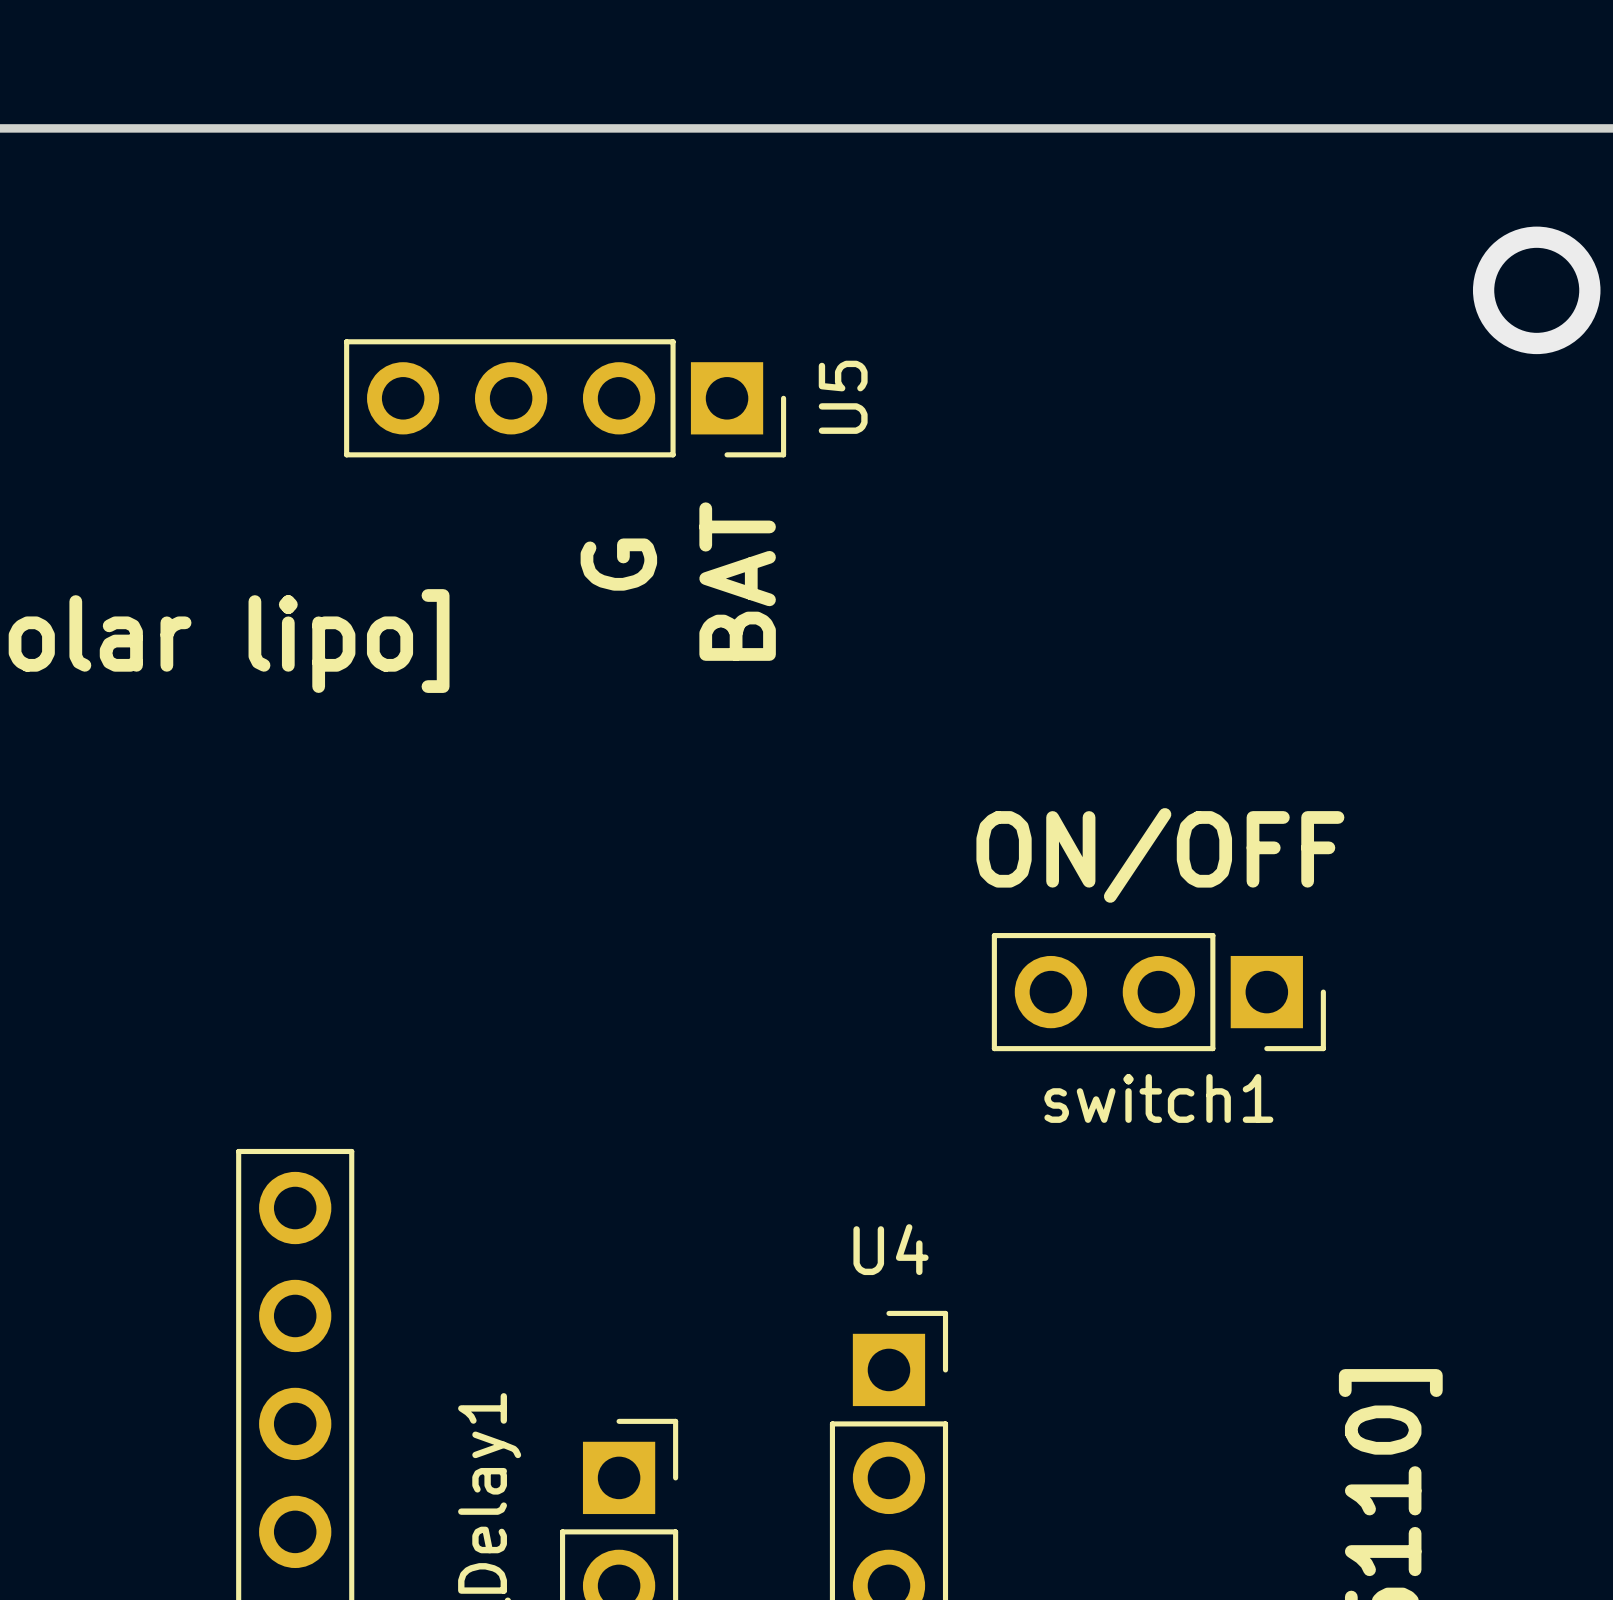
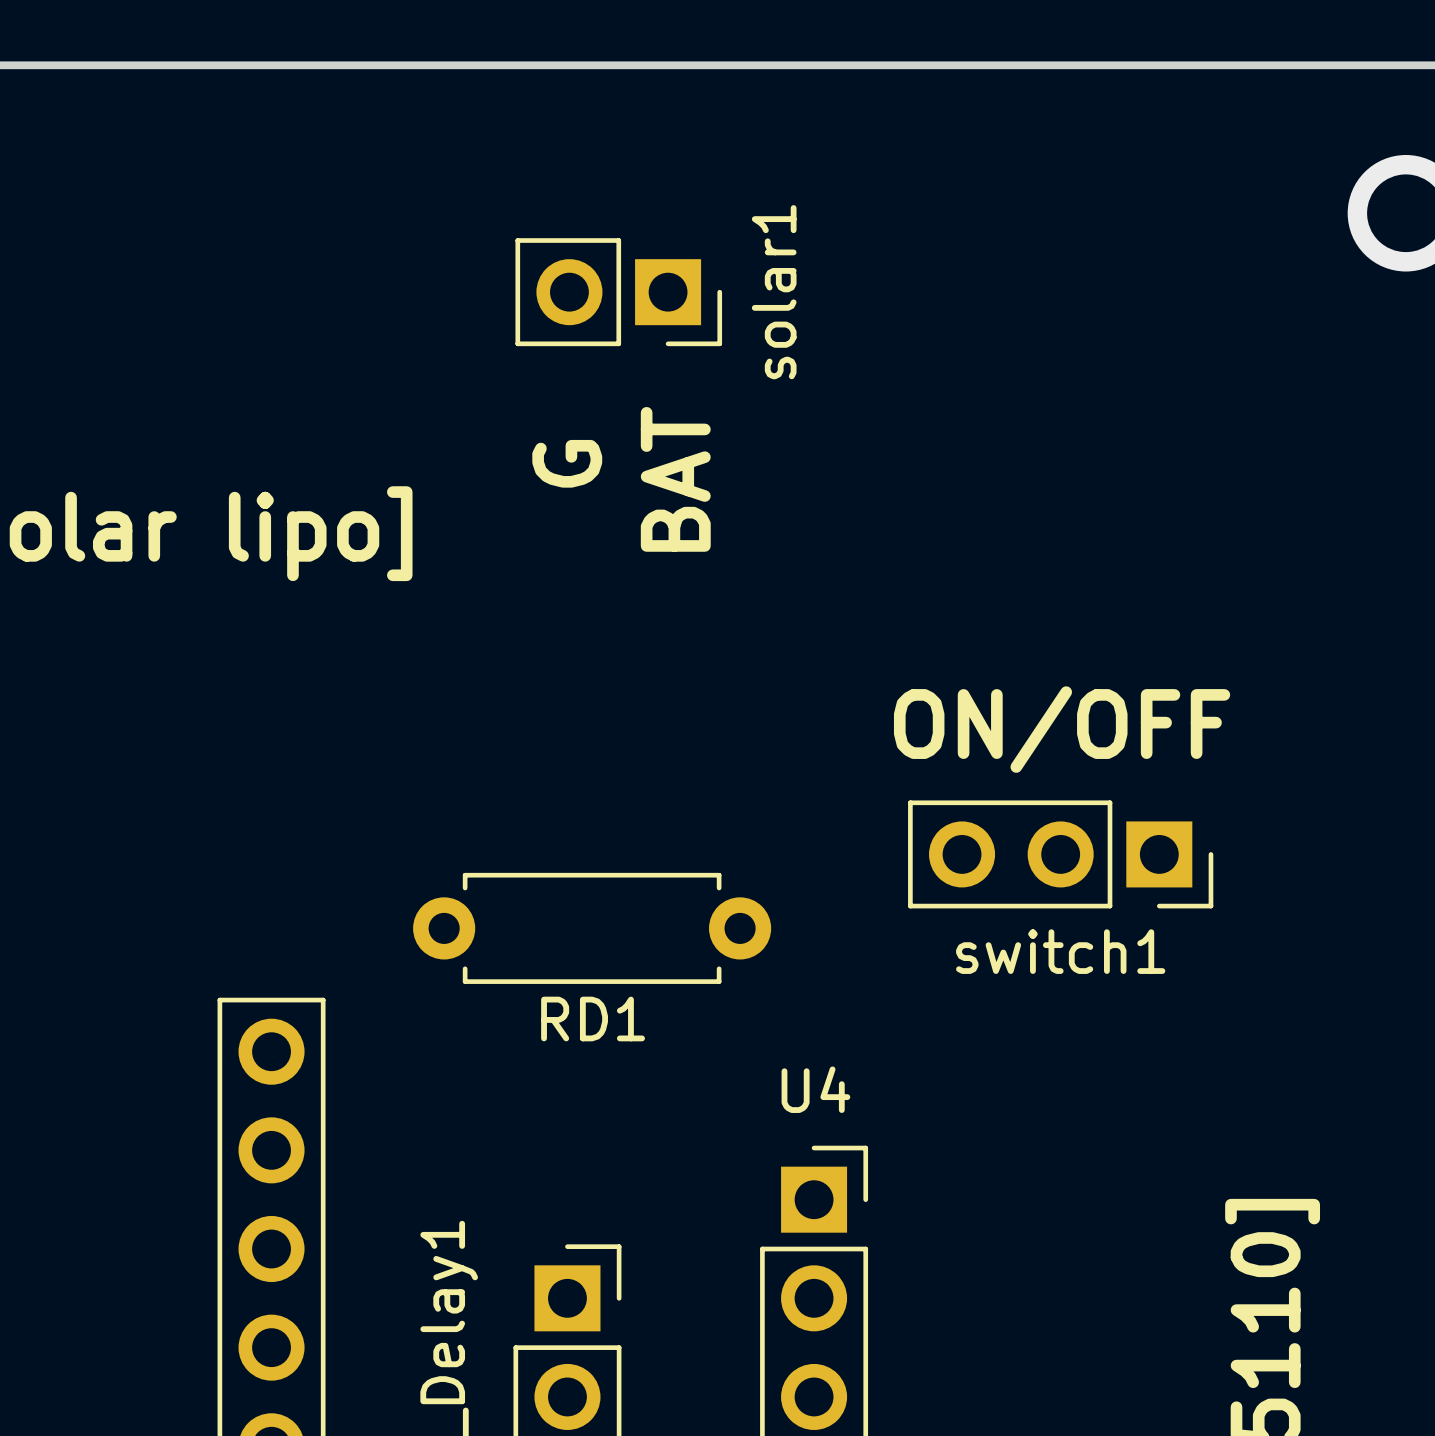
solar1: none -> (618, 292)
U5: (565, 398) -> none
RD1: none -> (592, 928)

